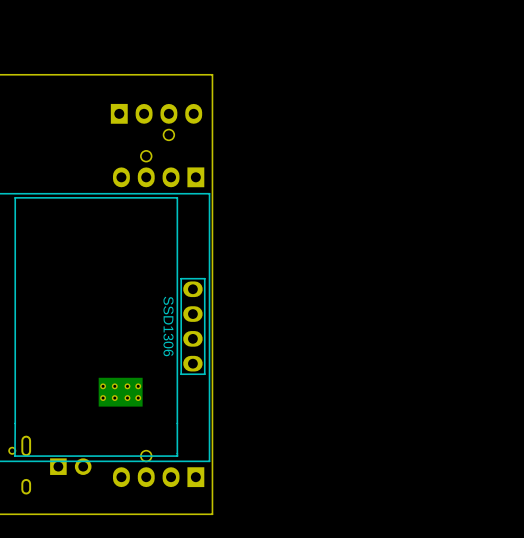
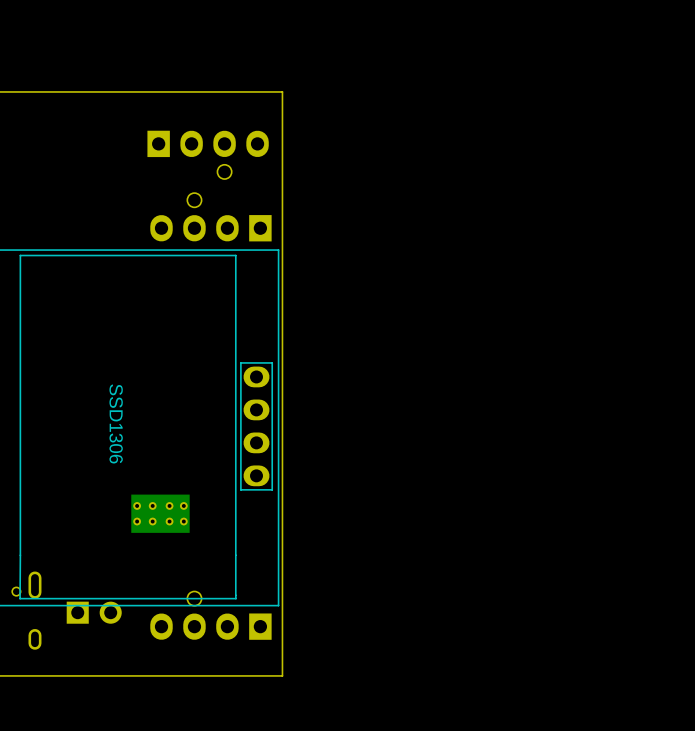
SSD1306 name: none -> SSD1306 (116, 423)
SSD1306 value: SSD1306 (168, 326) -> none

